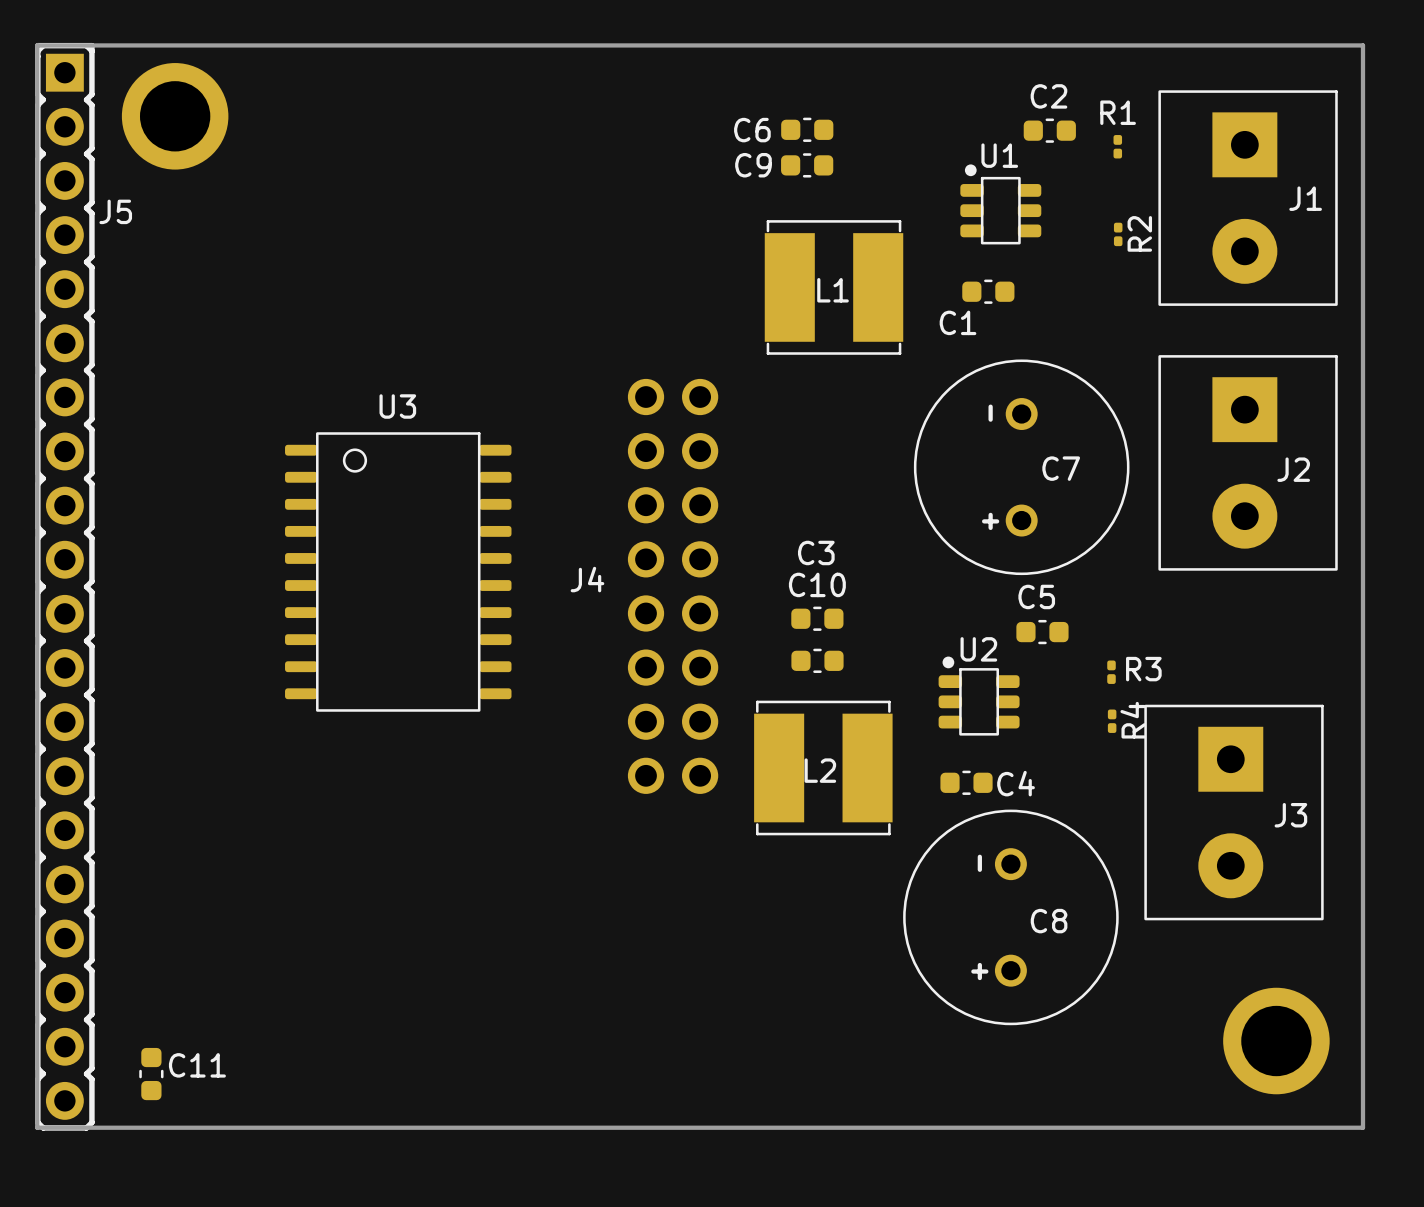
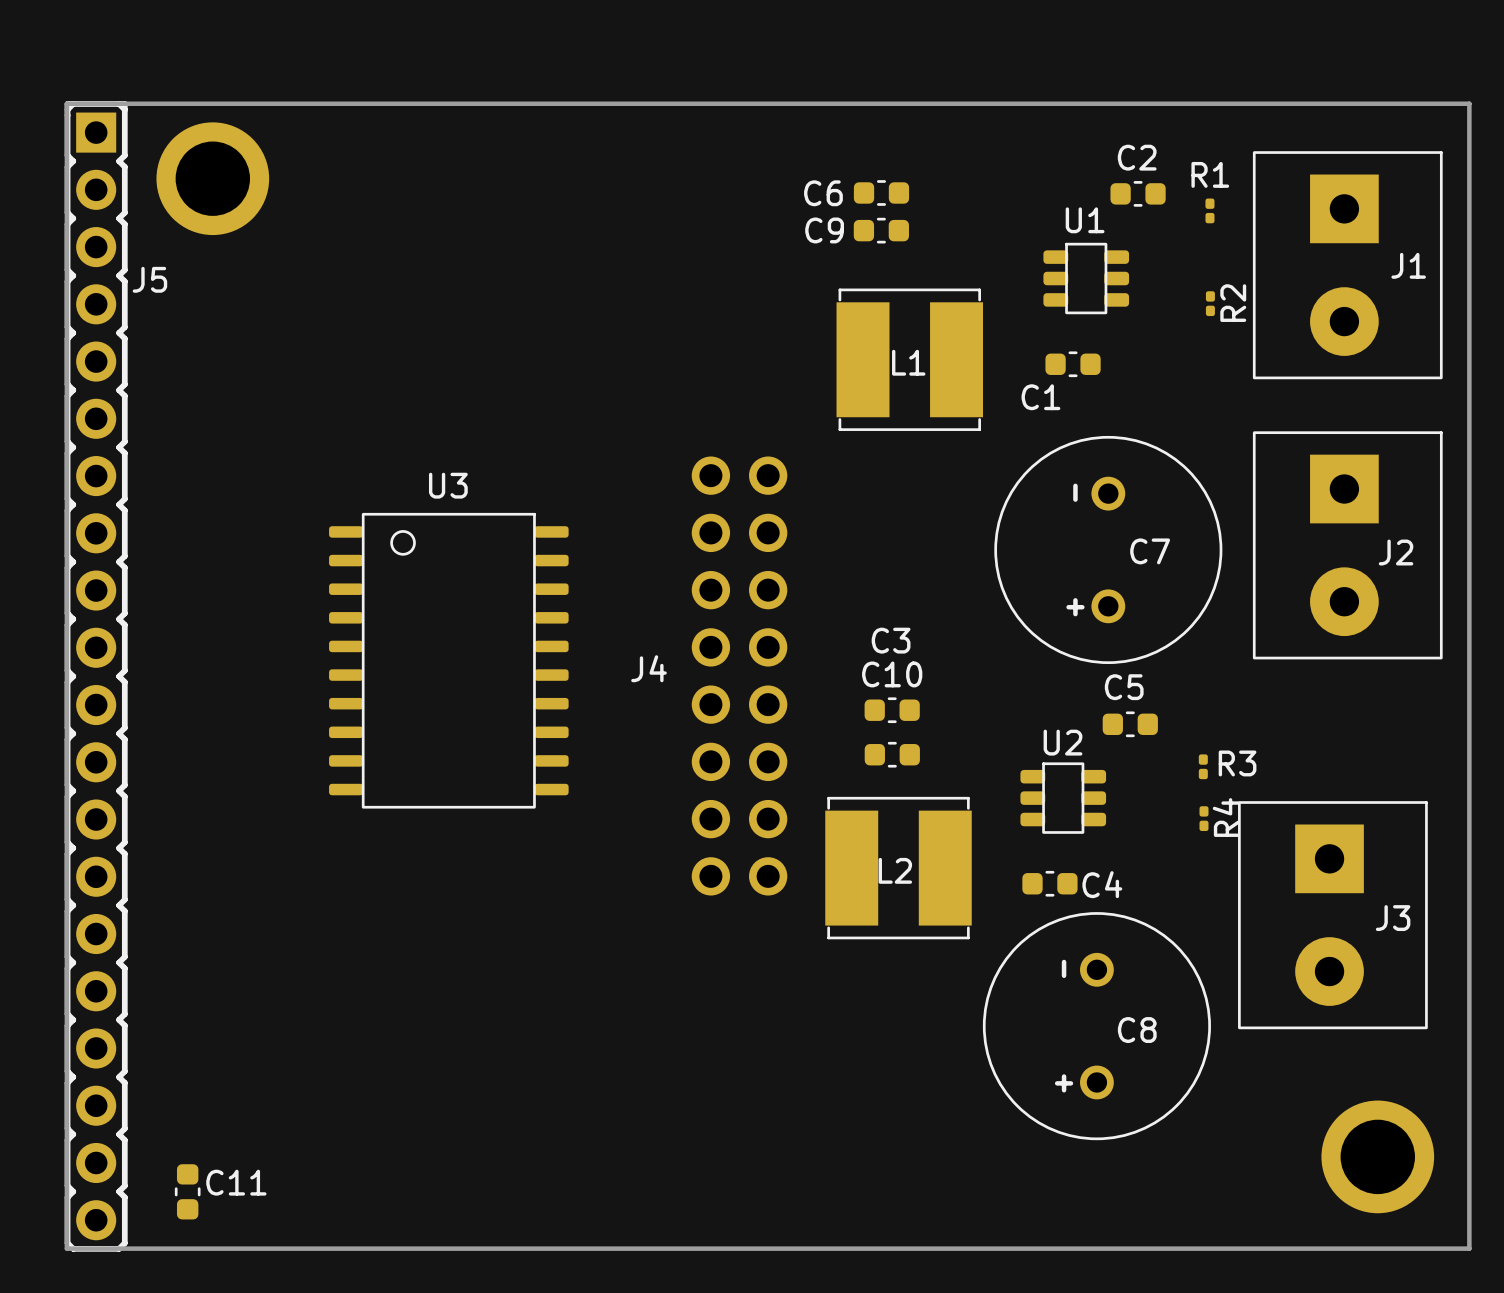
drawing: [964, 164, 977, 177] -> none
drawing: [942, 656, 955, 669] -> none

